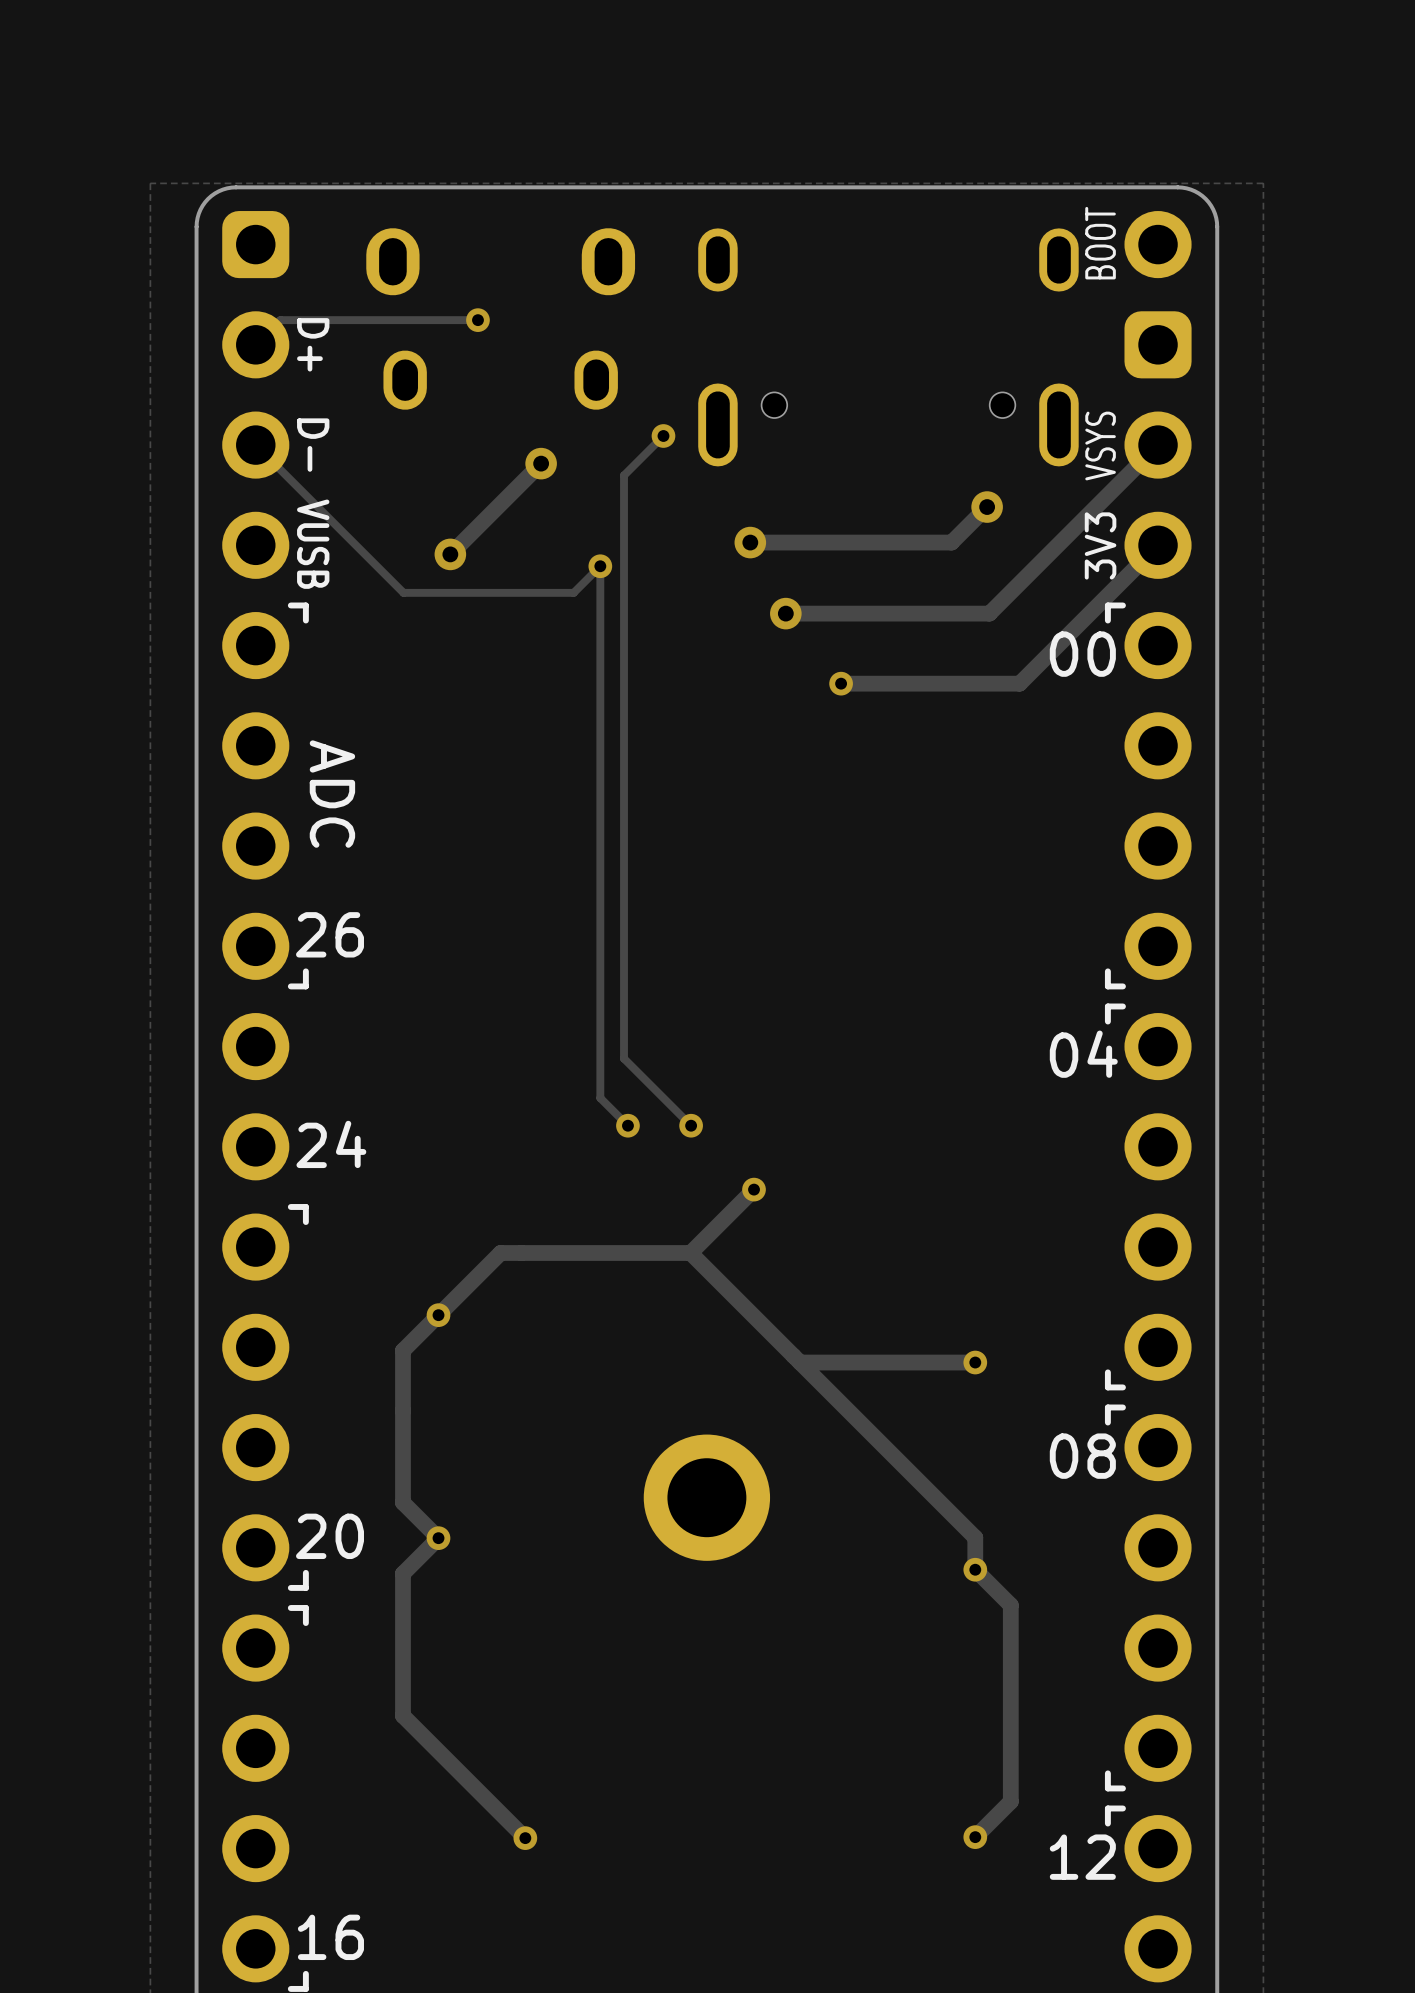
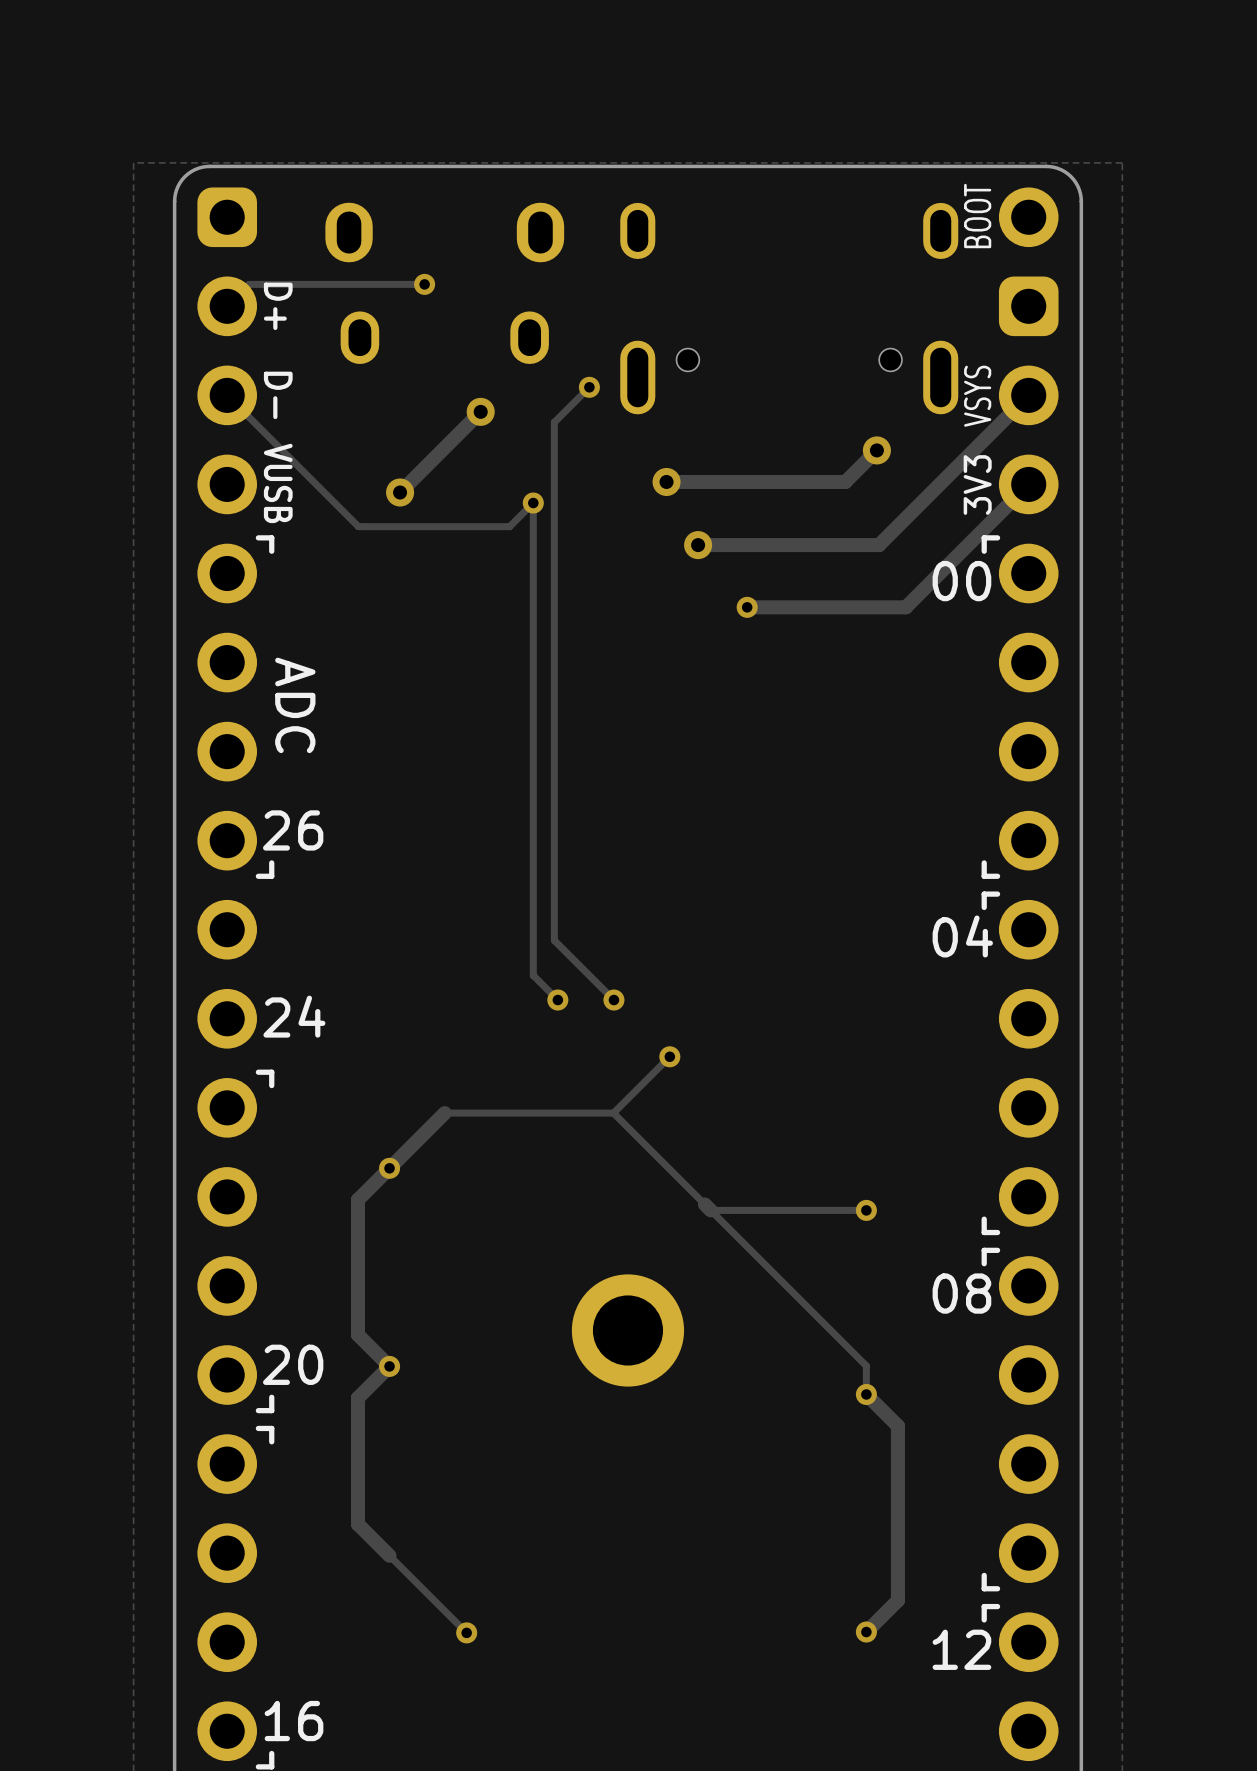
track width: thick (754, 1189) (690, 1253) -> thin (669, 1056) (613, 1113)
track width: thick (690, 1253) (793, 1355) -> thin (613, 1113) (704, 1204)
track width: thick (690, 1253) (500, 1253) -> thin (613, 1113) (444, 1113)
track width: thick (975, 1362) (800, 1362) (975, 1537) (975, 1569) -> thin (866, 1210) (710, 1210) (866, 1365) (866, 1394)
track width: thick (438, 1751) (525, 1838) -> thin (389, 1555) (466, 1632)

